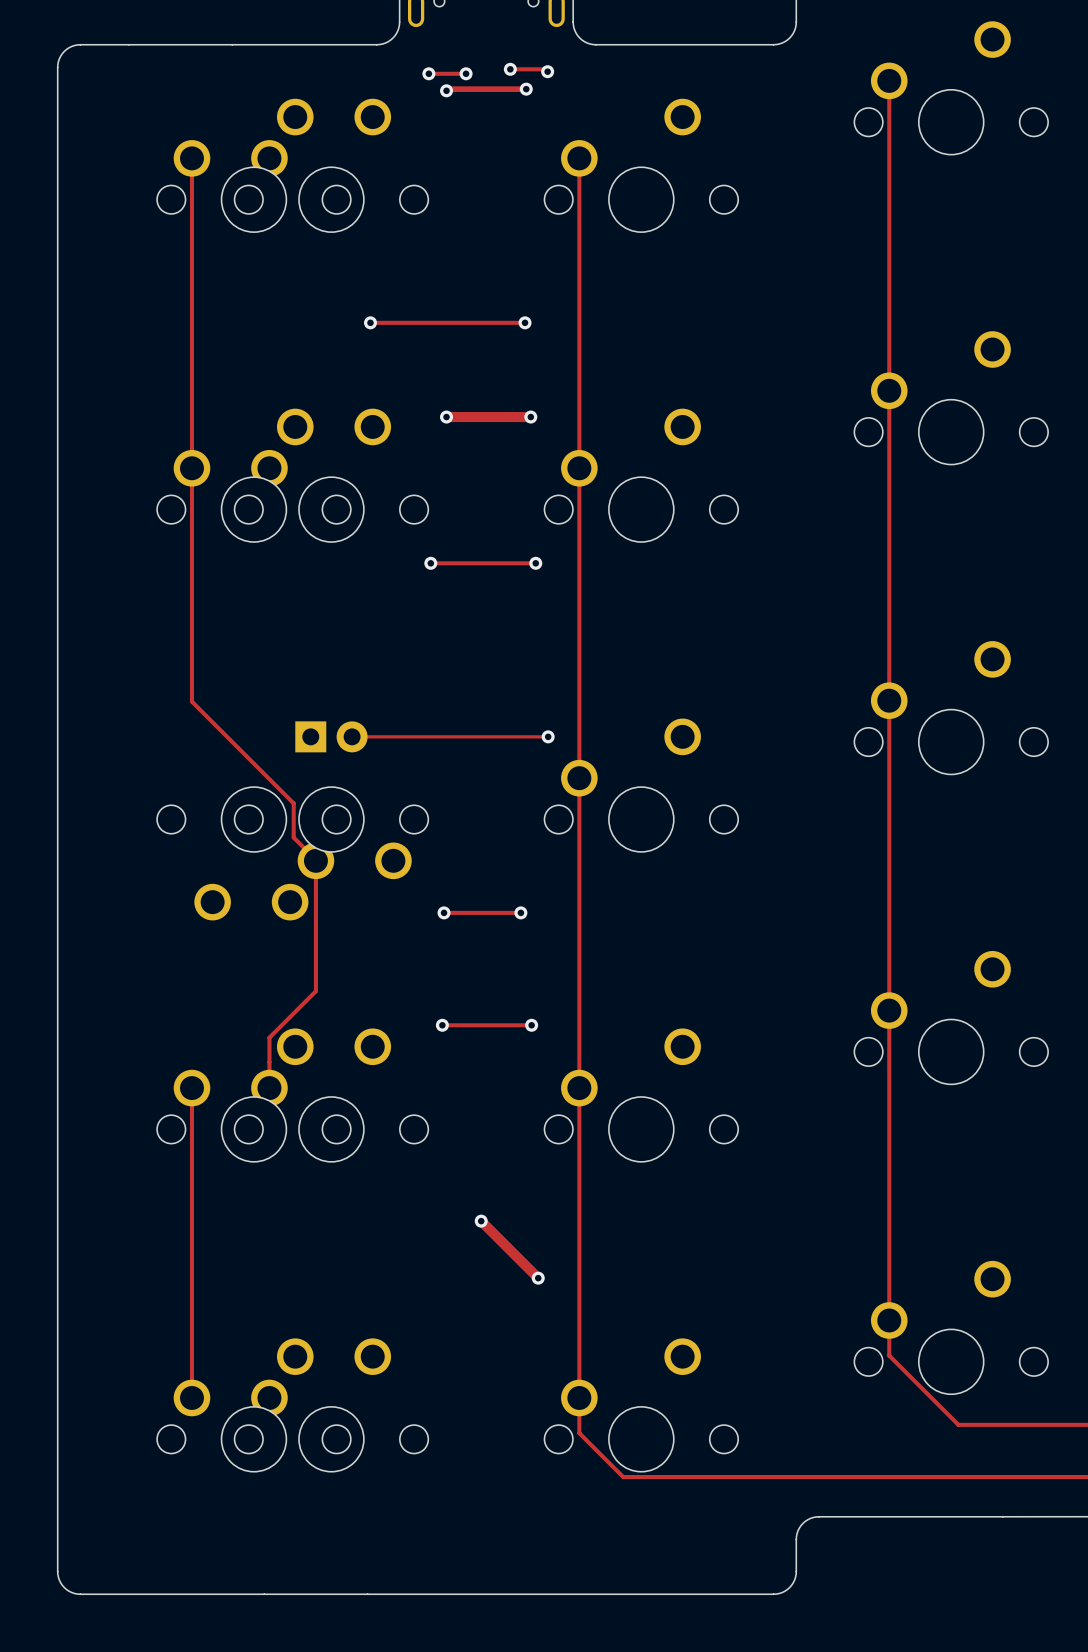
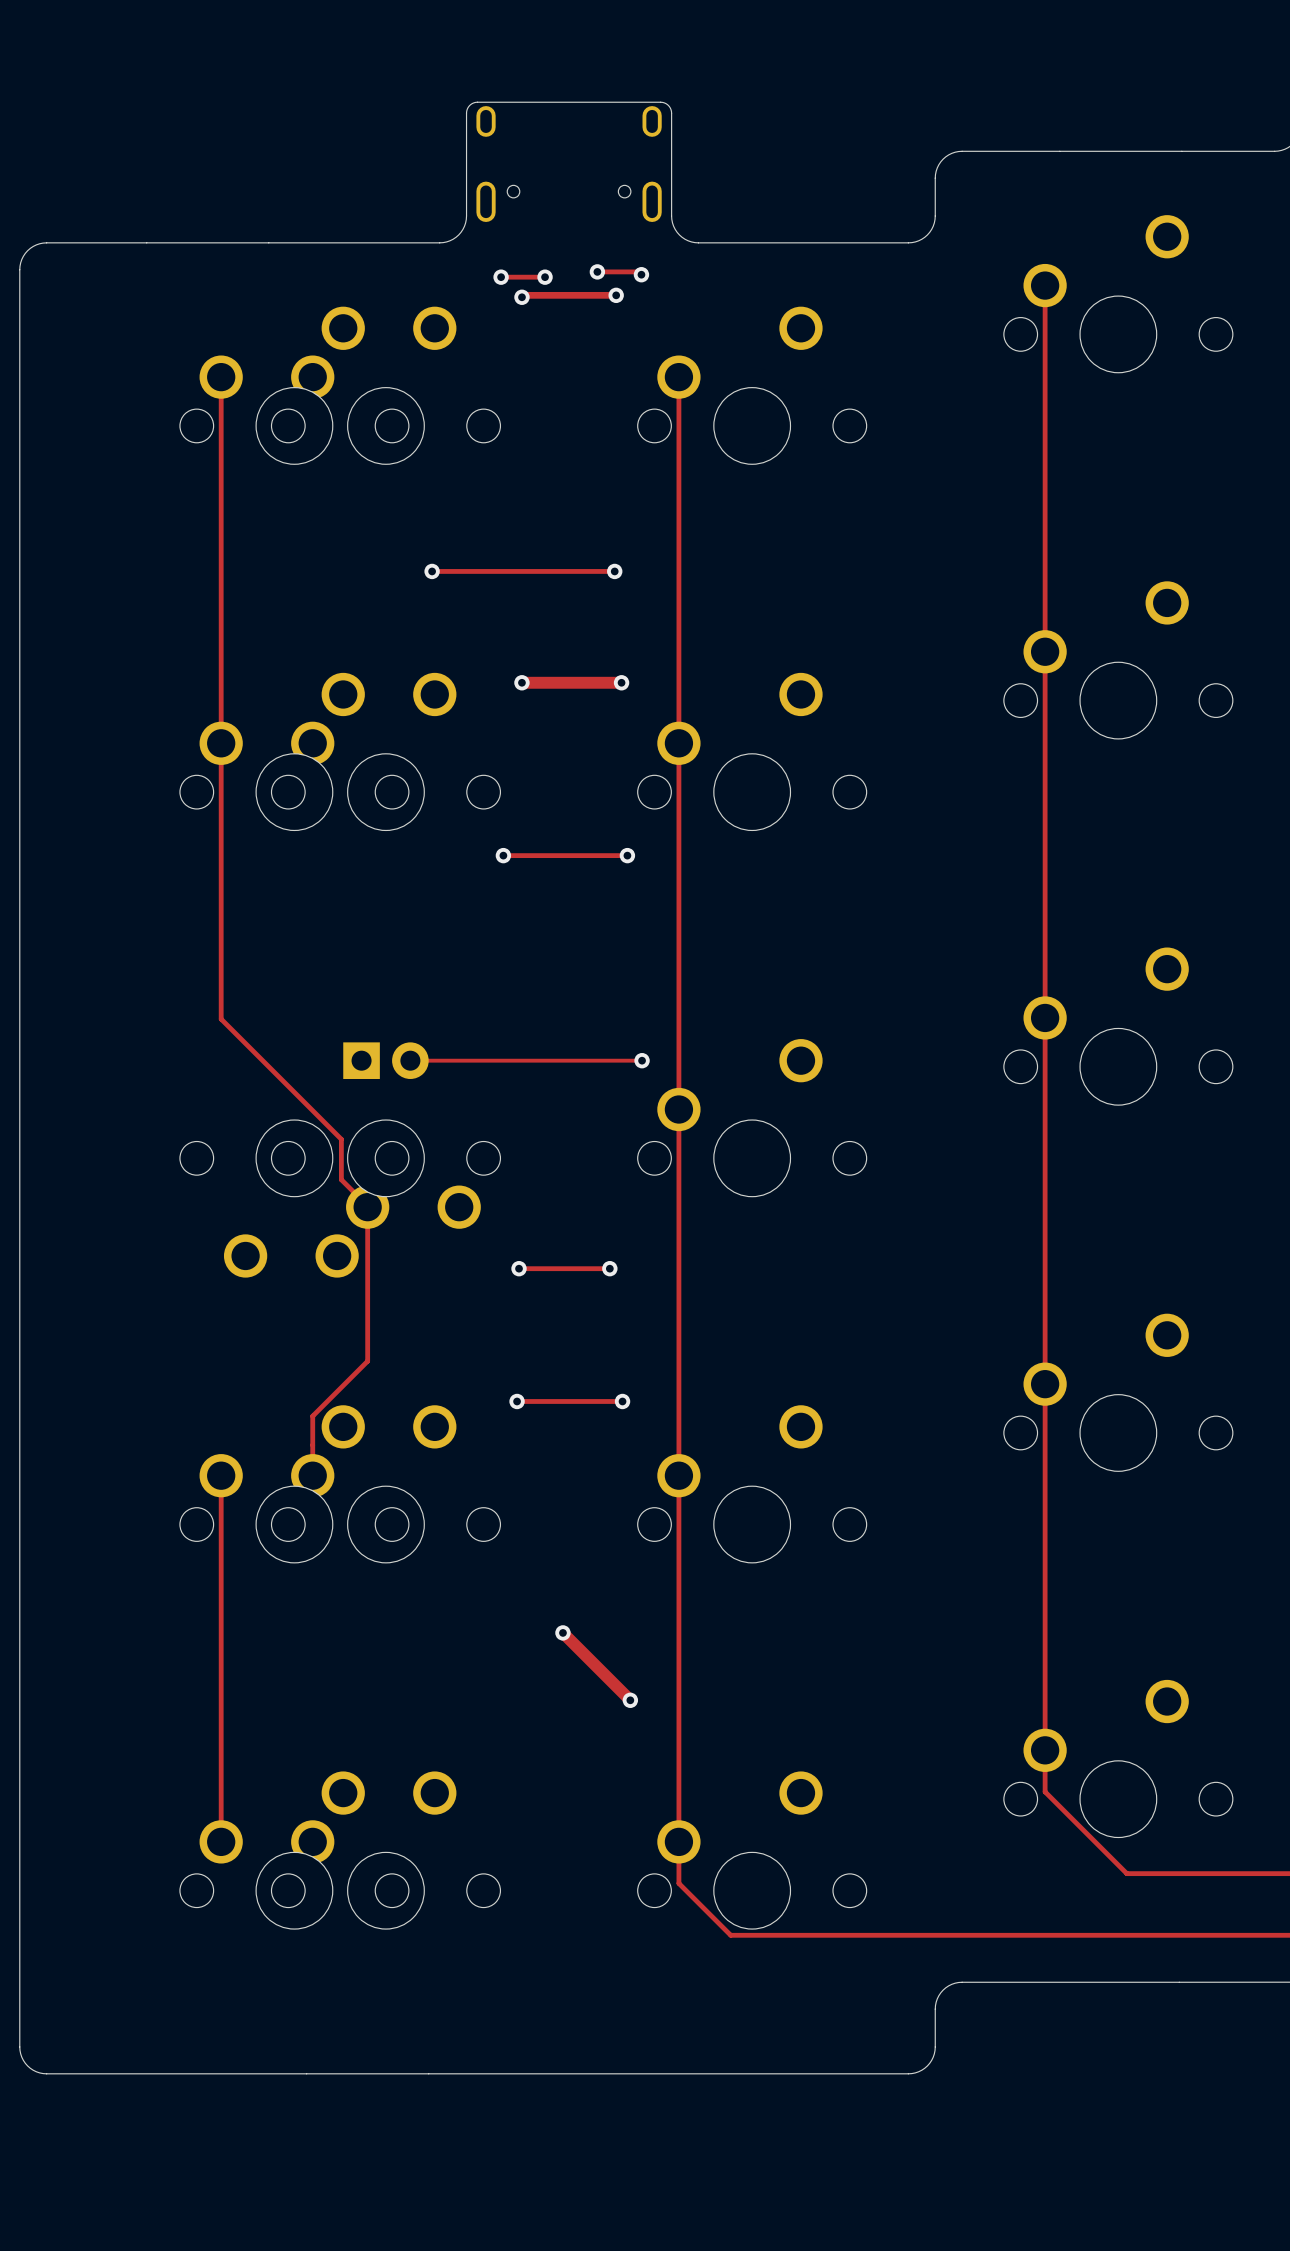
board edge: (80, 44) (71, 46) (64, 51) (59, 58) (57, 67) -> none
board edge: (57, 67) (57, 1571) (59, 1580) (64, 1587) (71, 1592) (80, 1594) -> (89, 242) (46, 242) (36, 244) (25, 253) (19, 269) (19, 2046) (25, 2063) (36, 2071) (46, 2073) (89, 2073)

